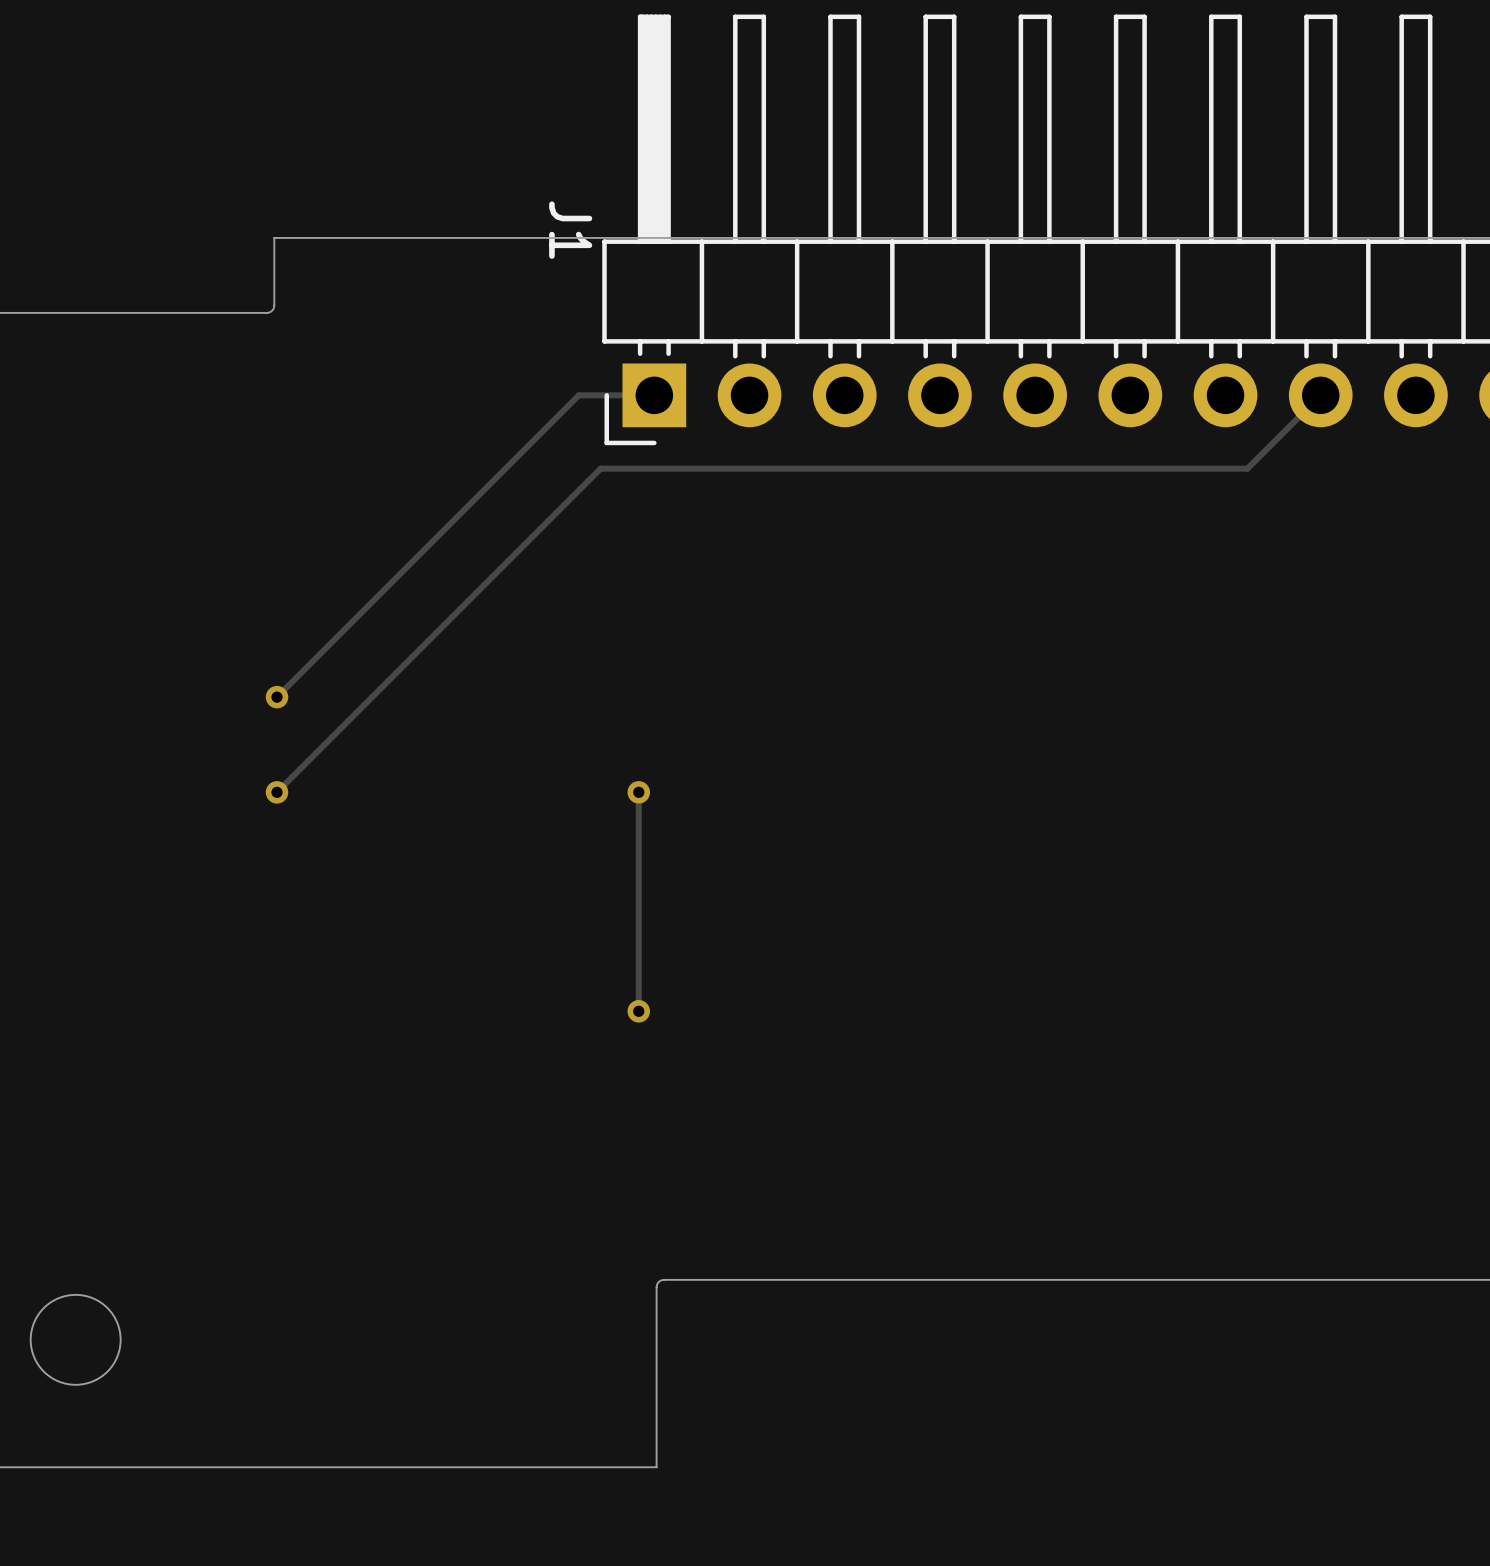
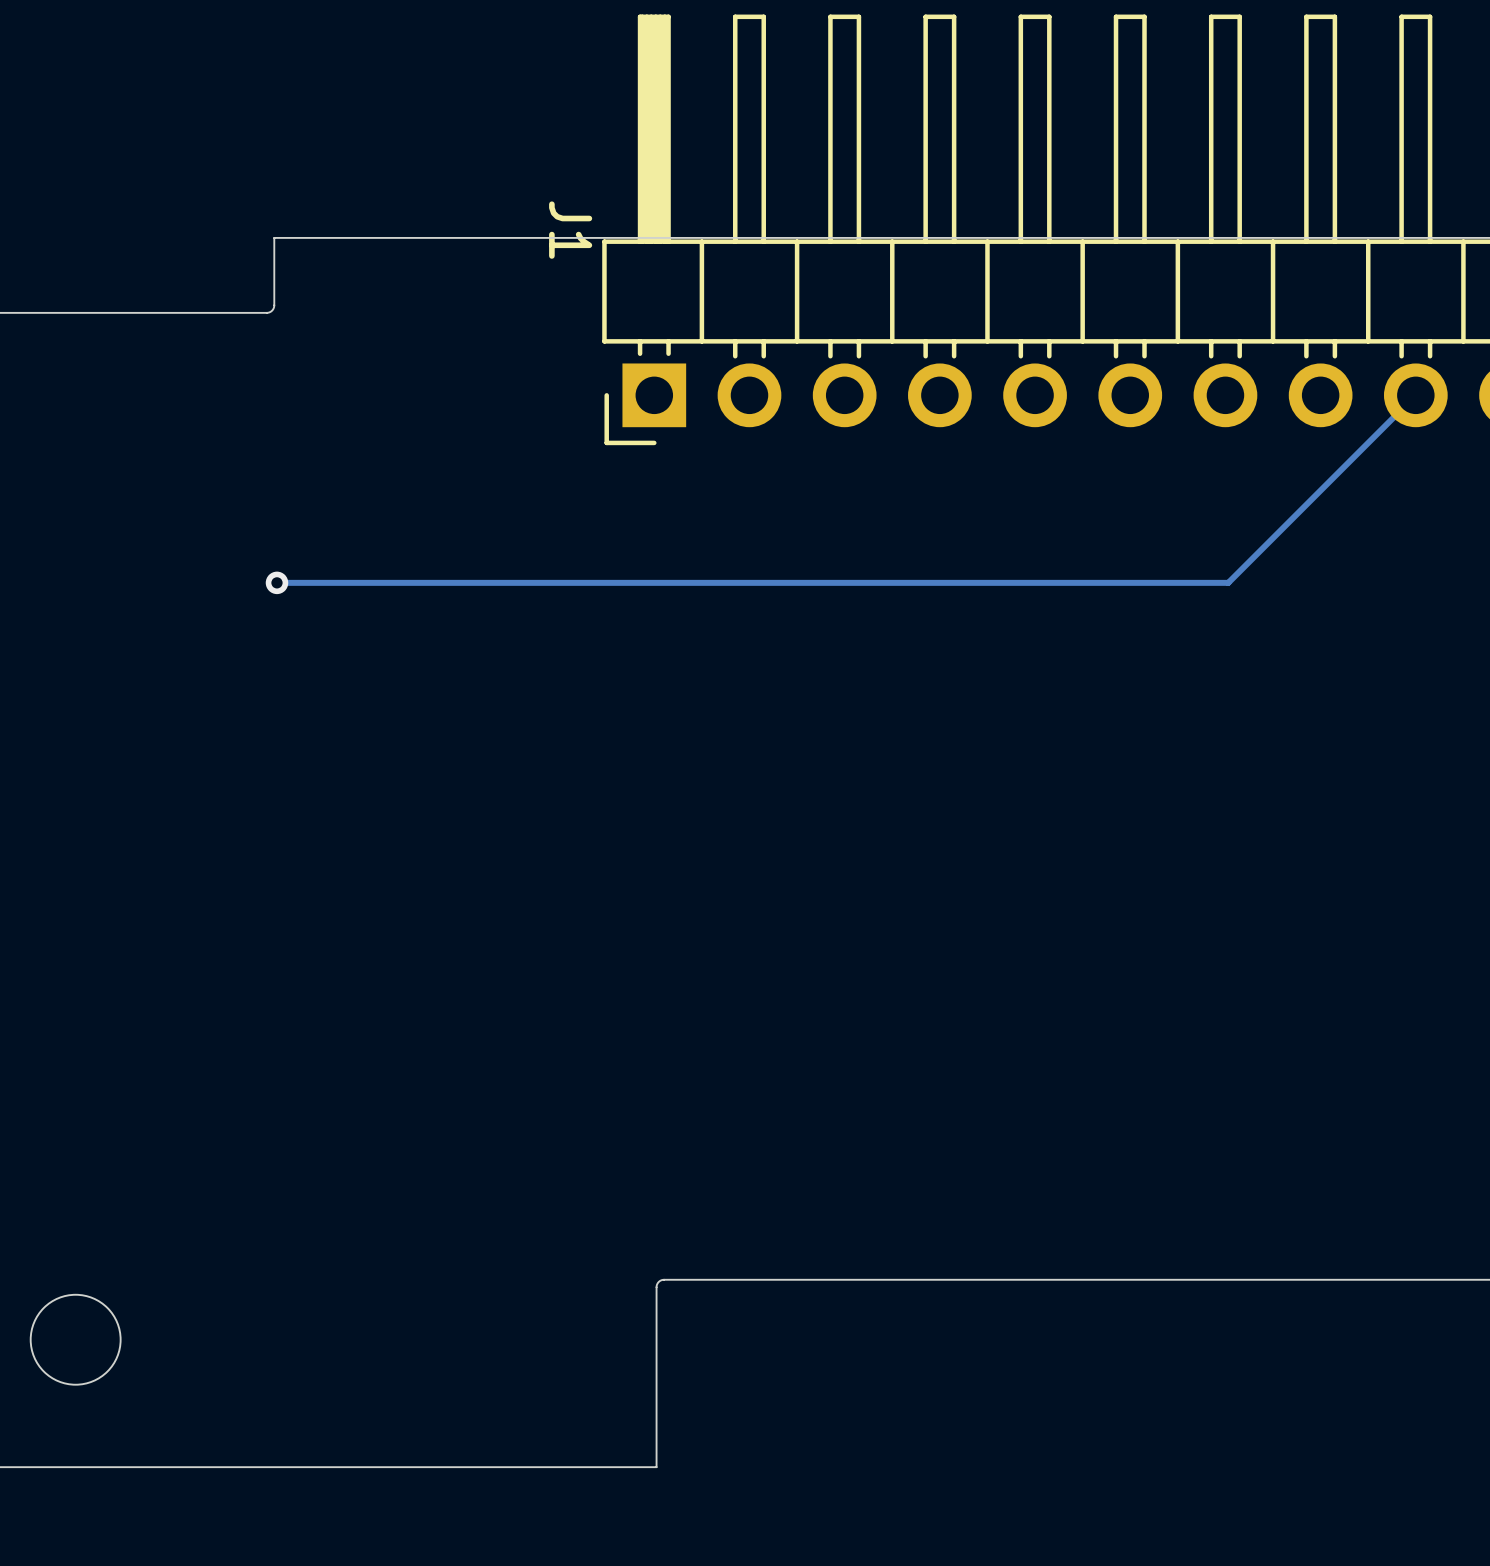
track: (654, 395) (578, 395) (277, 697) -> none
track: (1320, 395) (1247, 468) (600, 468) (277, 792) -> none
track: none -> (1415, 395) (1228, 582) (276, 582)
via: none -> (276, 582)
via: (277, 697) -> none
via: (277, 792) -> none
track: (638, 792) (638, 1011) -> none
via: (638, 792) -> none
via: (638, 1011) -> none

